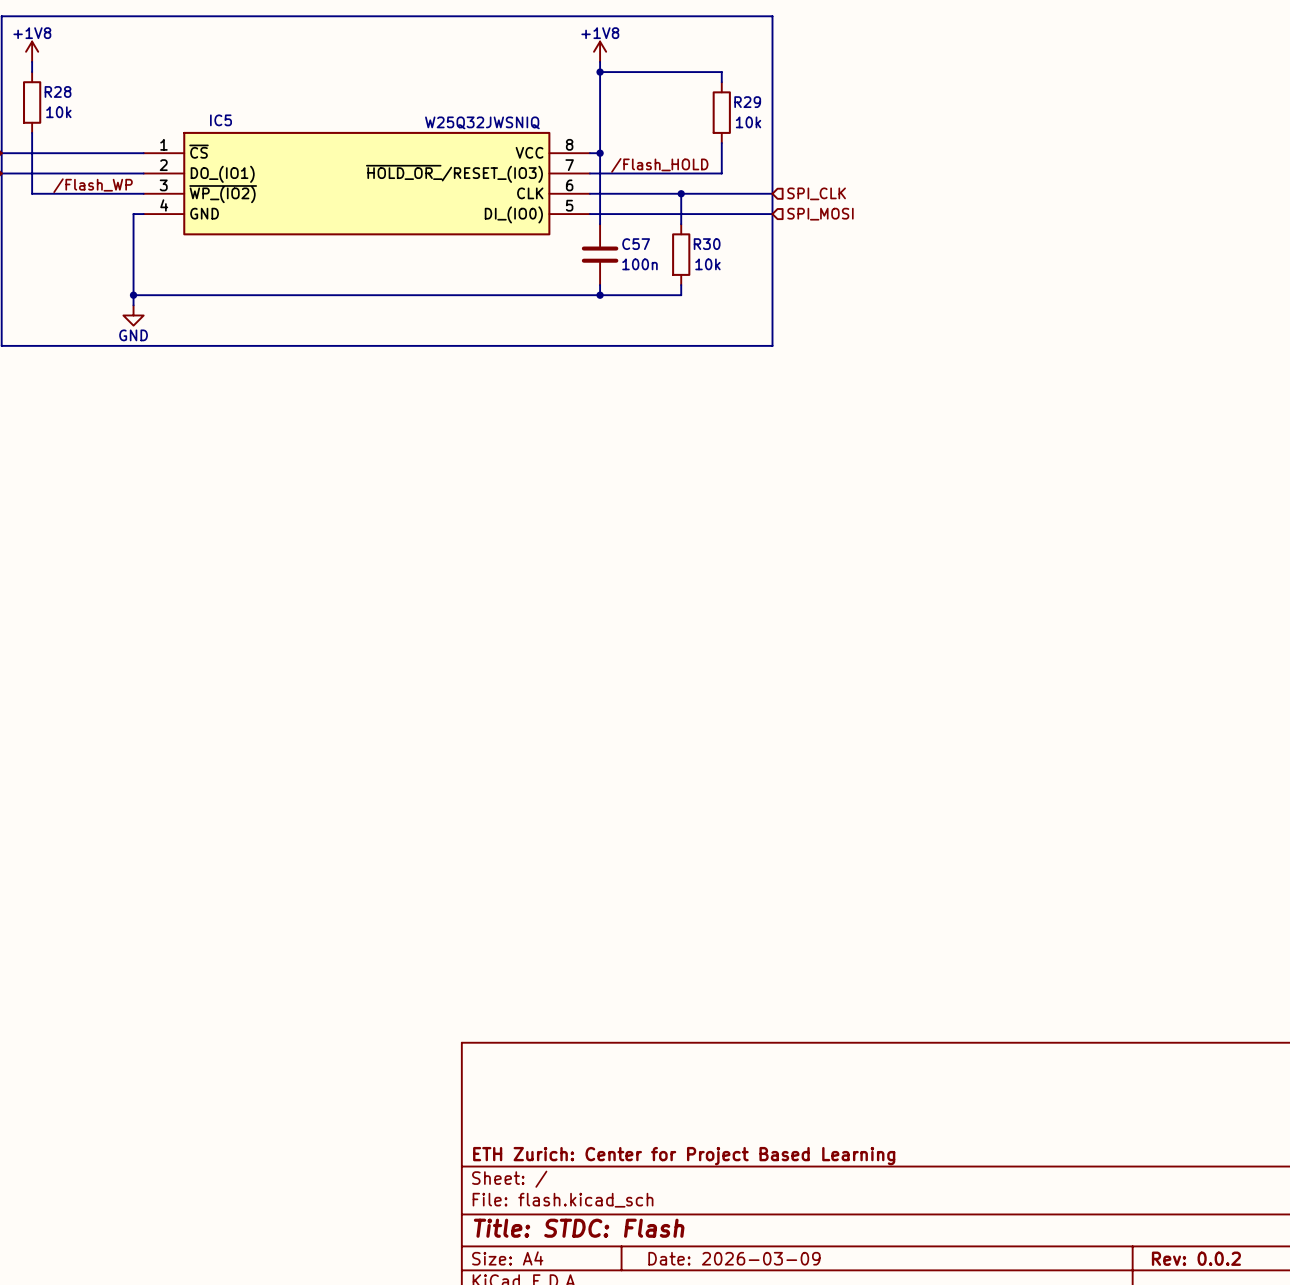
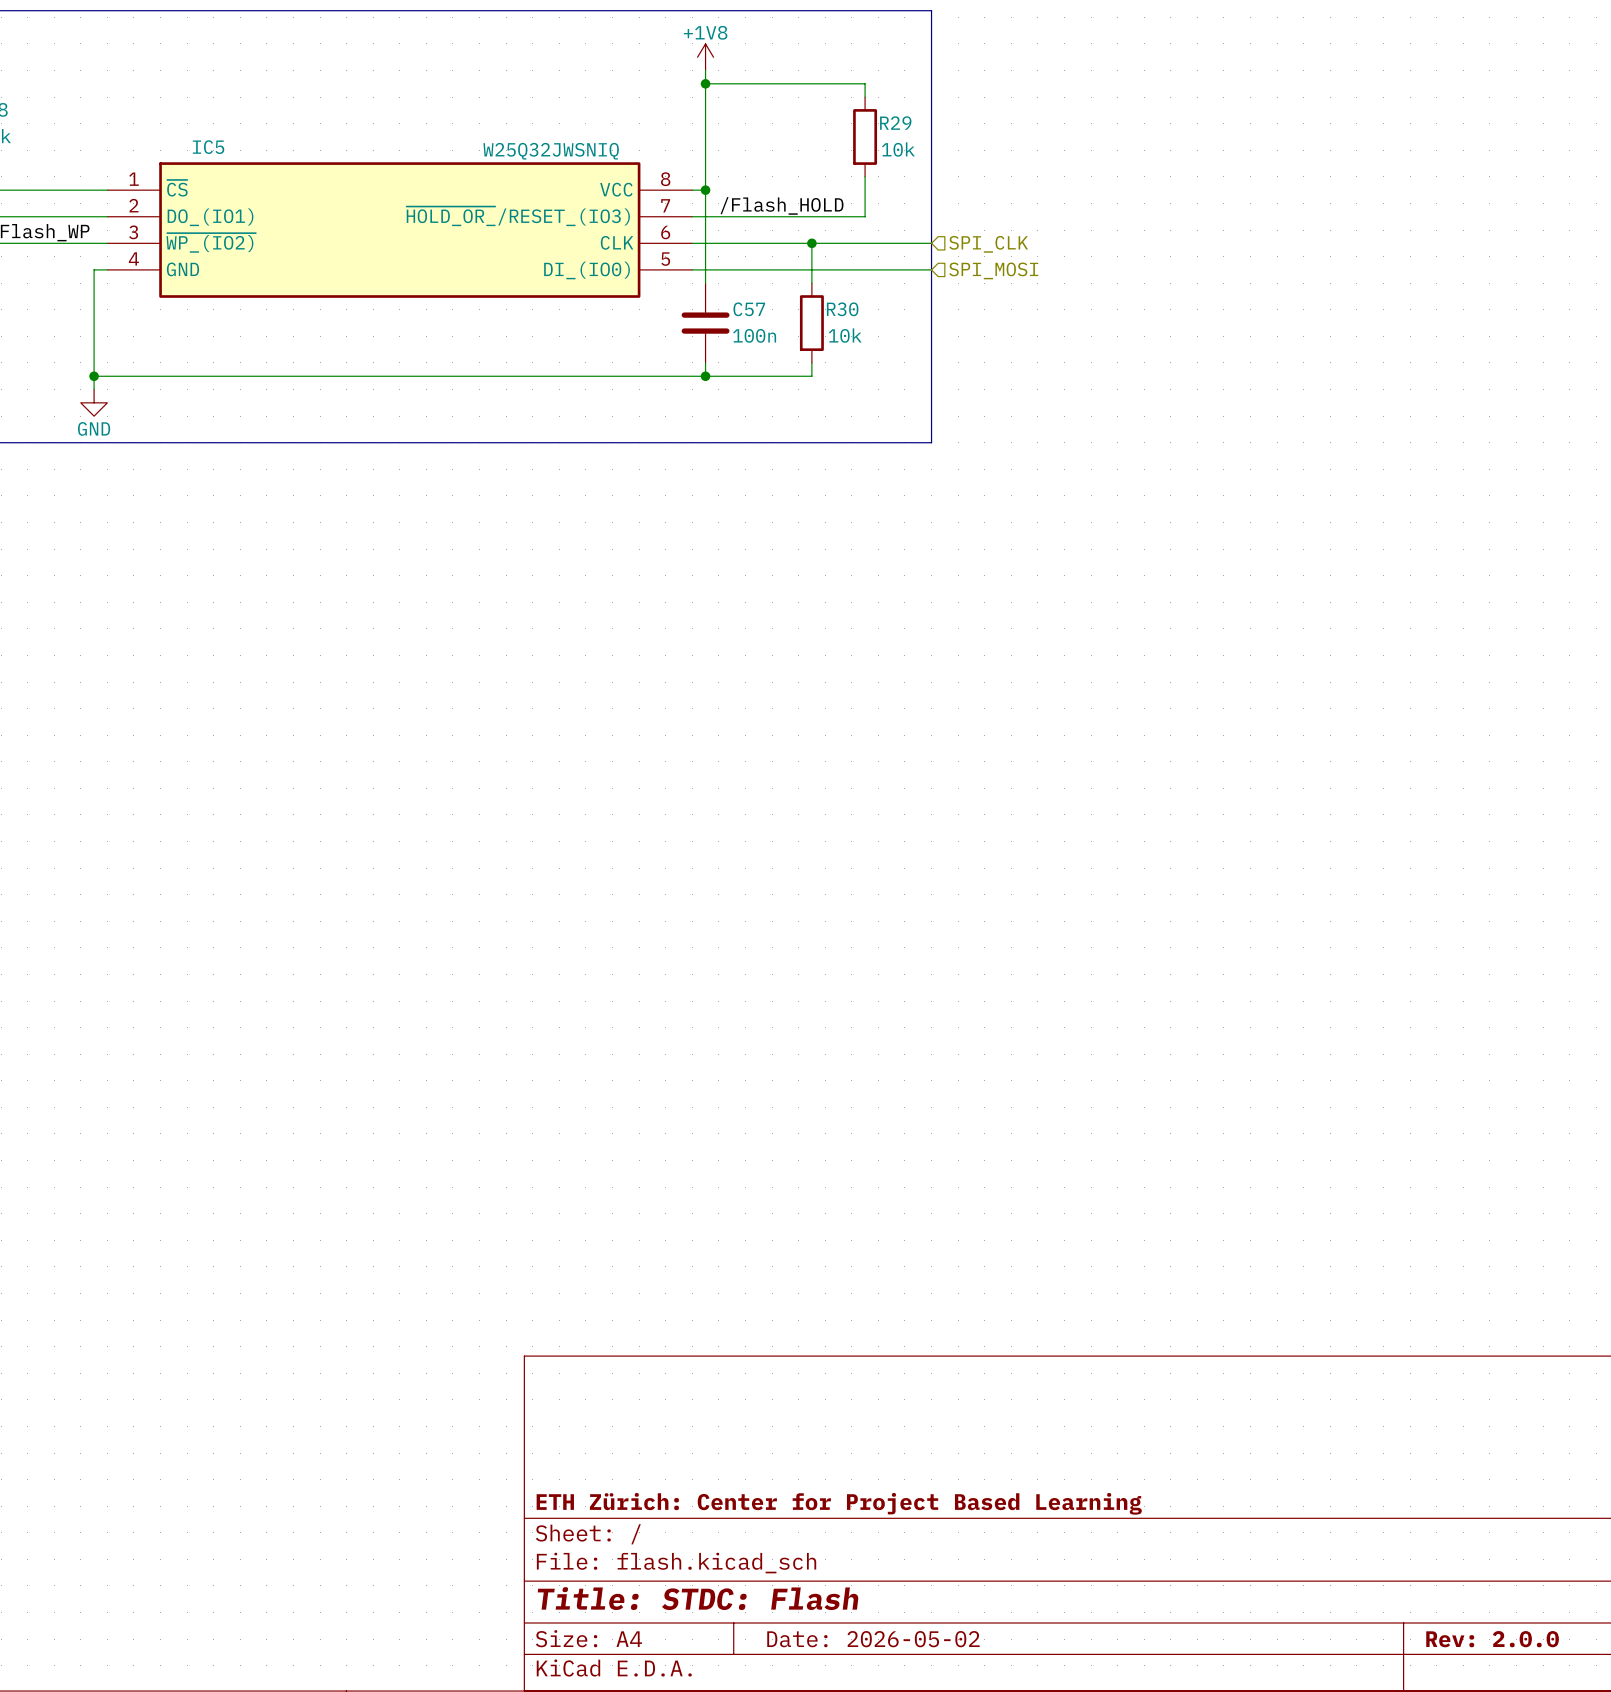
title block: ETH Zurich: Center for Project Based Learning (684, 1156) -> ETH Zürich: Center for Project Based Learning (839, 1503)
title block: Date: 2026-03-09 (734, 1258) -> Date: 2026-05-02 (873, 1639)
title block: Rev: 0.0.2 (1196, 1258) -> Rev: 2.0.0 (1492, 1639)

